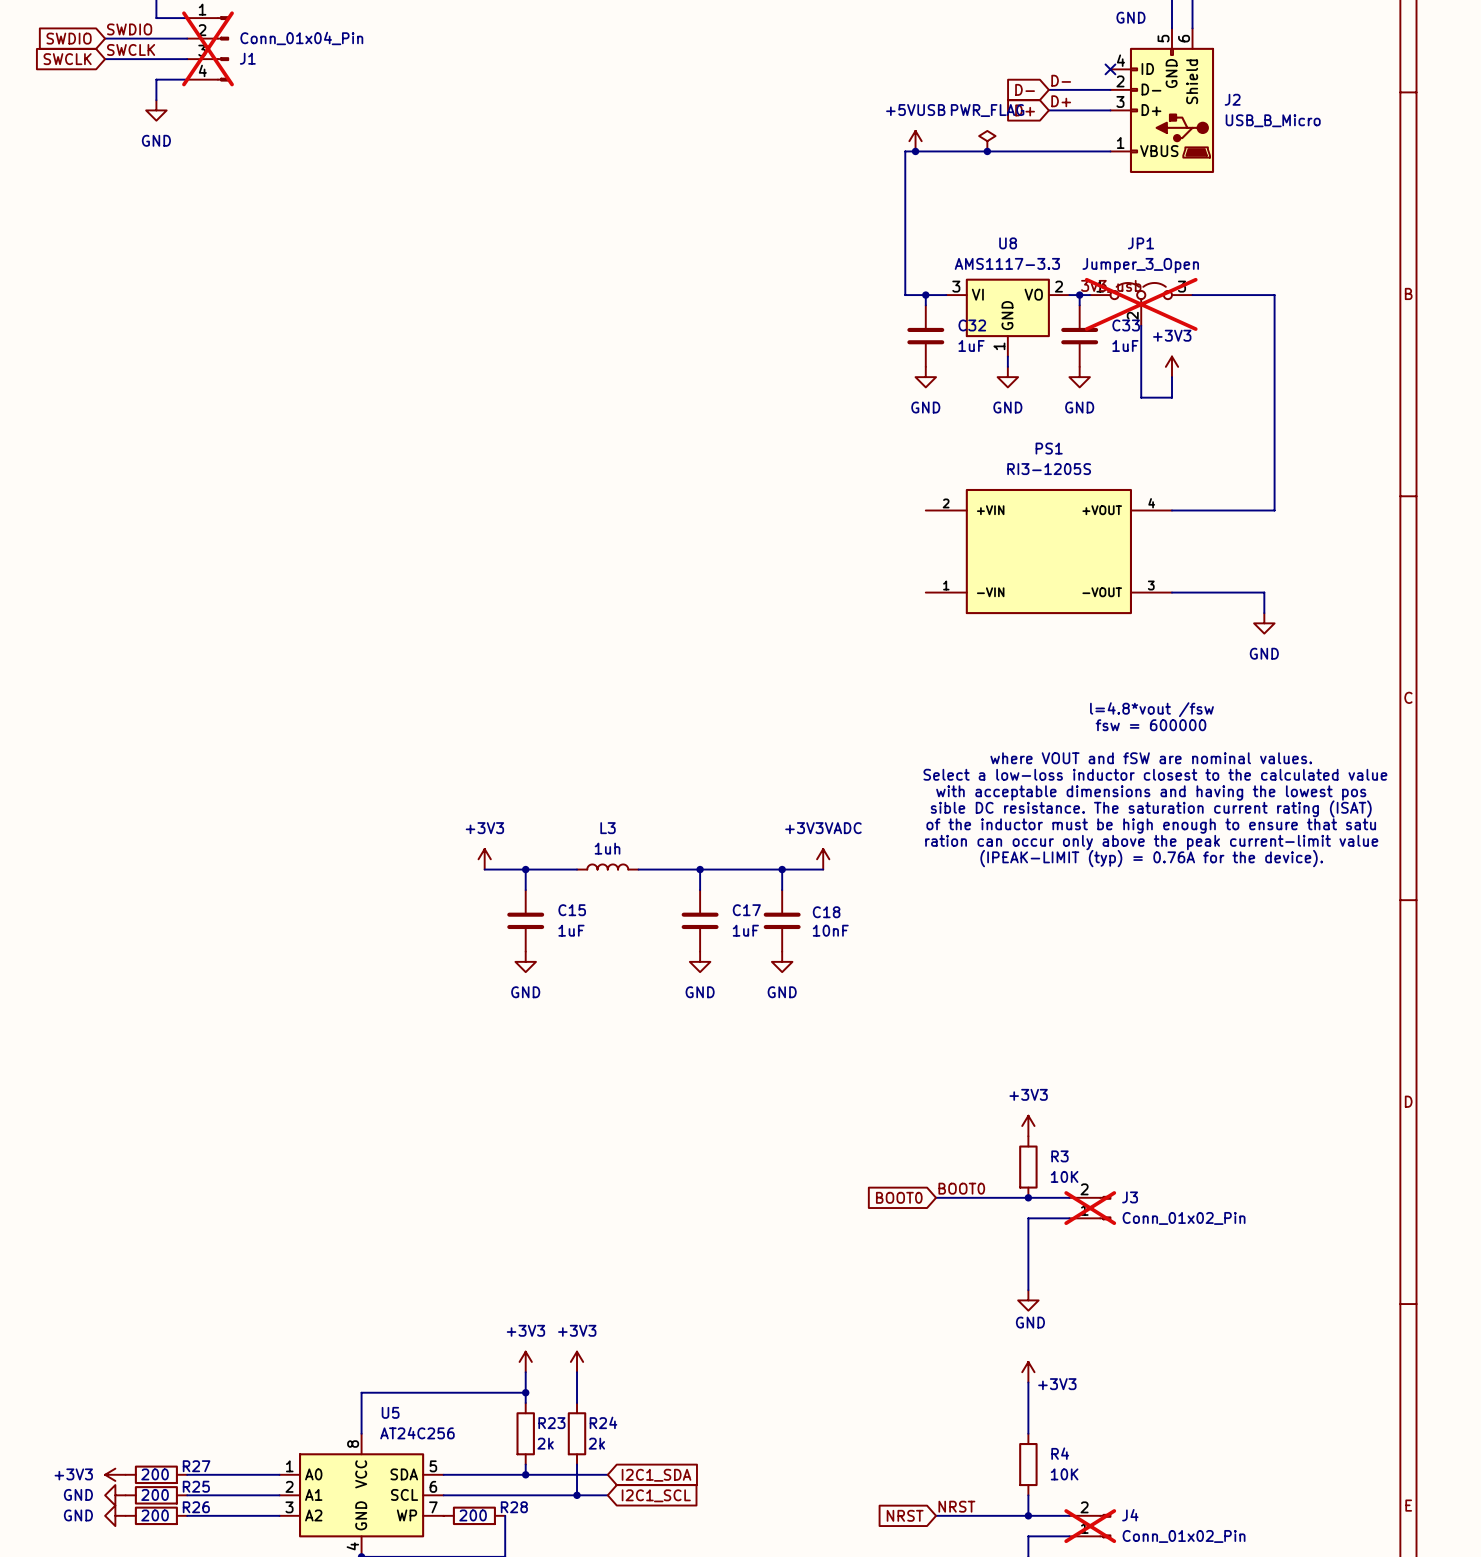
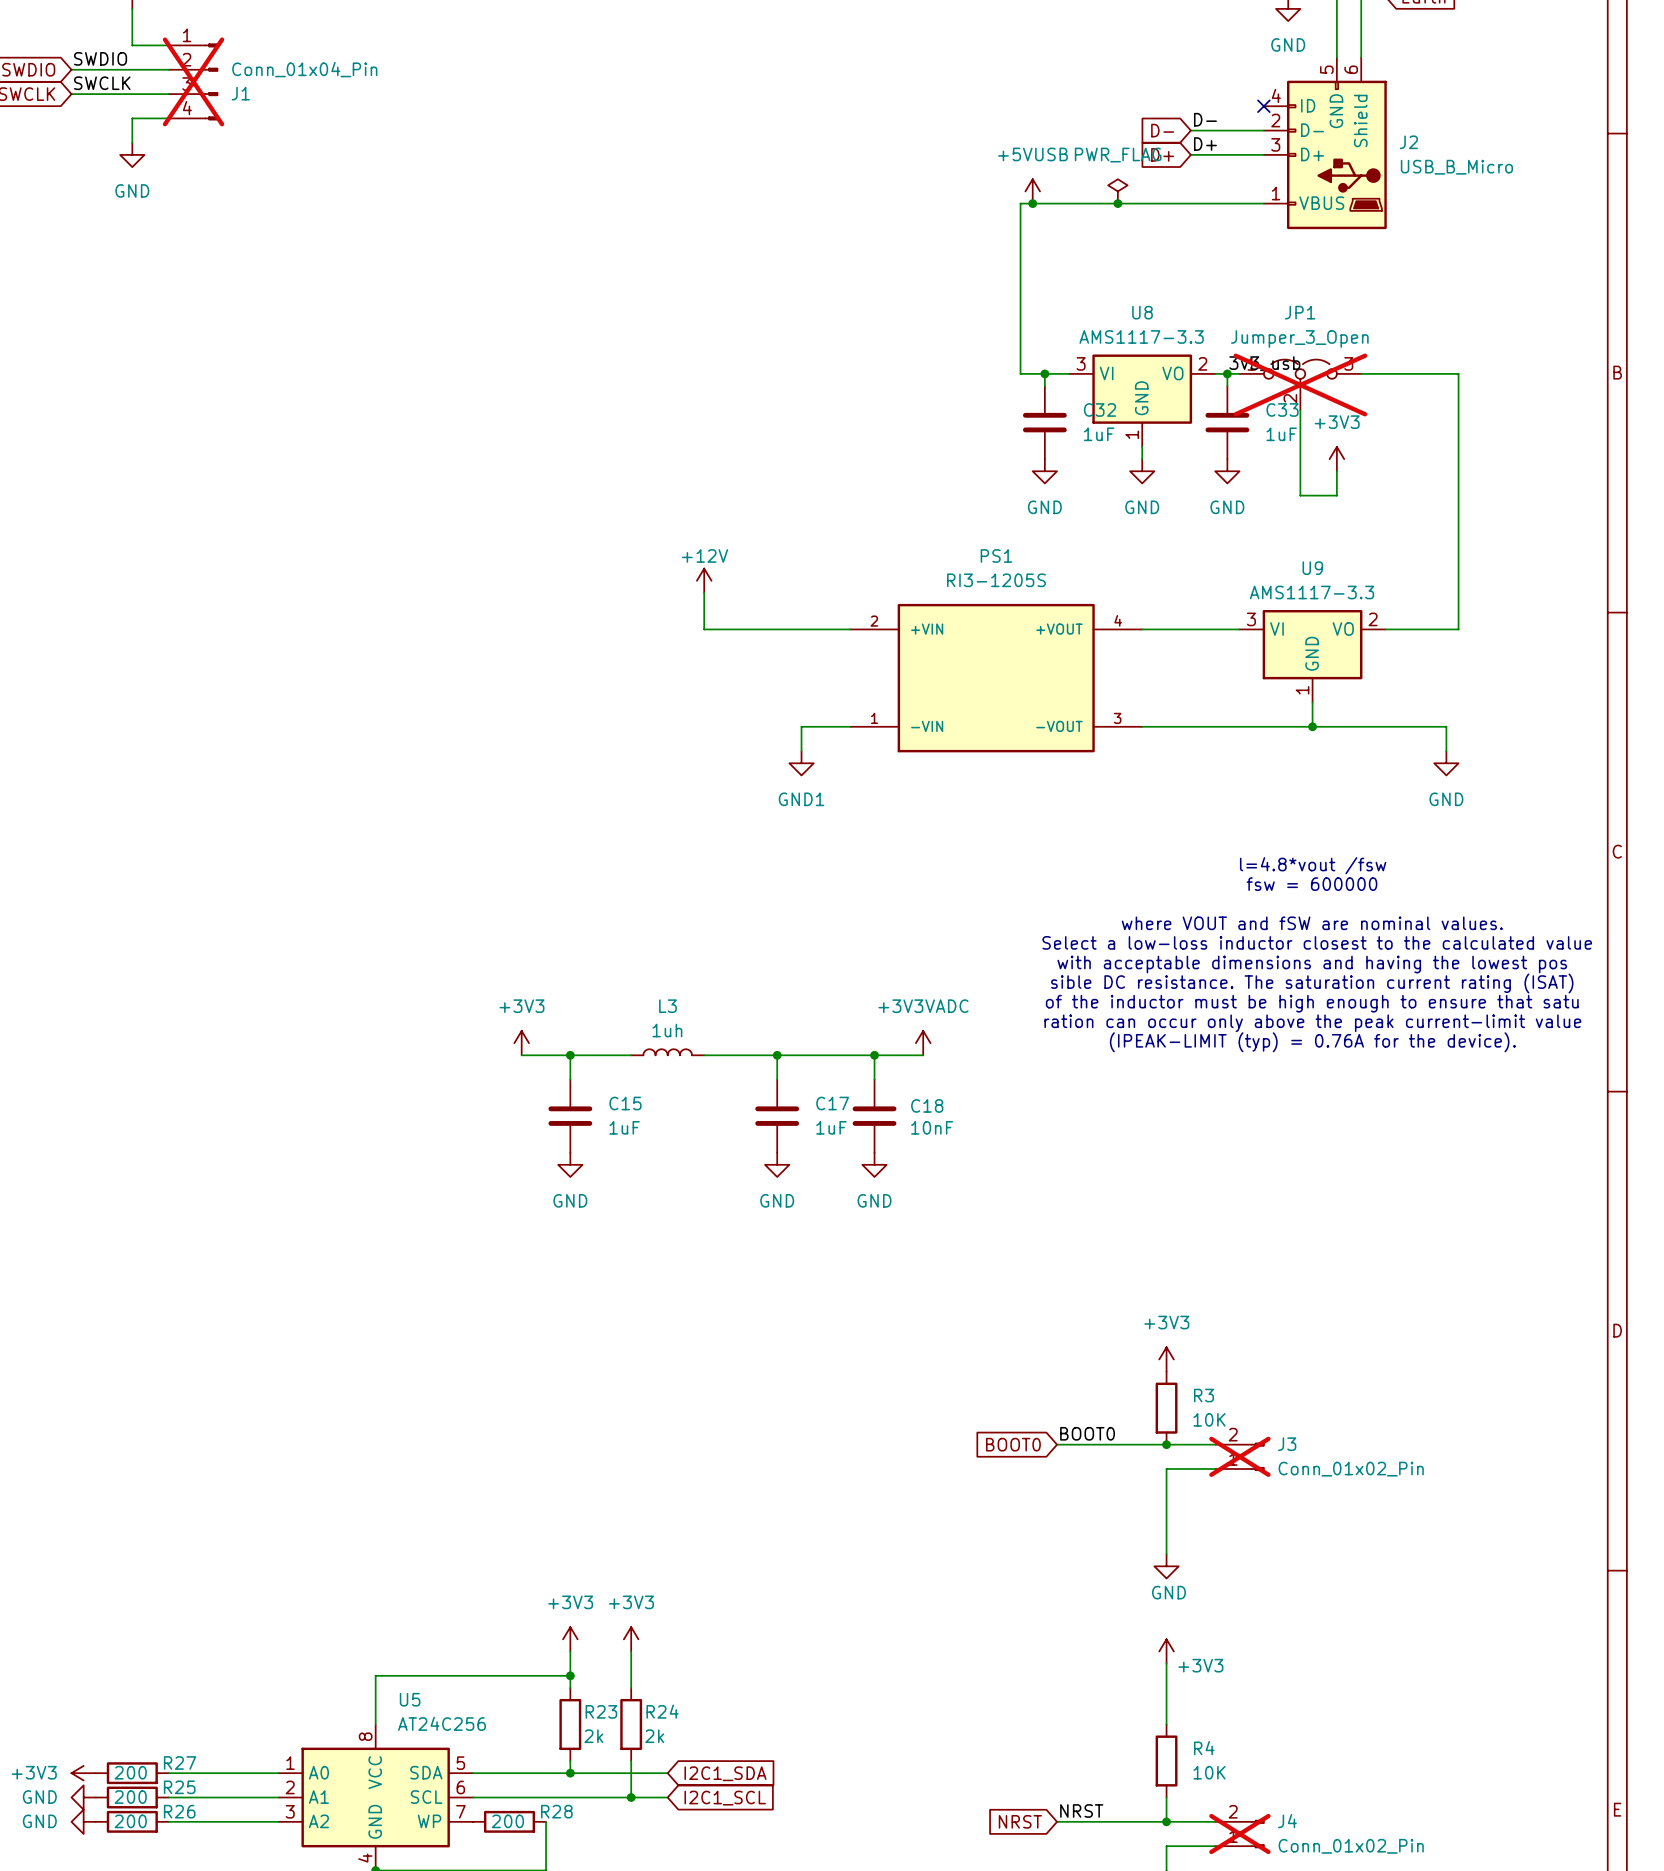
power symbol: none -> +12V (704, 580)
wire: none -> (704, 592) (704, 629) (850, 629)
U9: none -> AMS1117-3.3 (1312, 656)
PS1 position: (1048, 551) -> (996, 678)
wire: none -> (1312, 702) (1312, 726)
wire: none -> (850, 726) (801, 726) (801, 751)
junction: none -> (1312, 726)
power symbol: none -> GND1 (801, 763)

